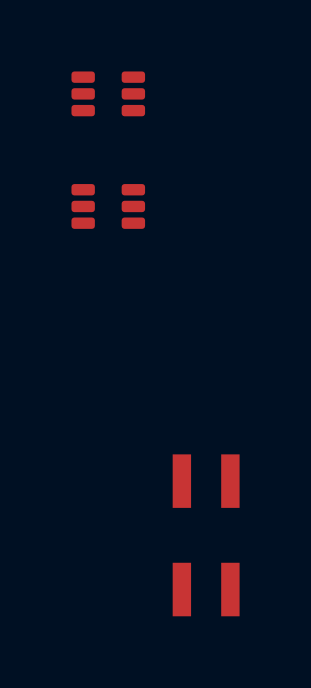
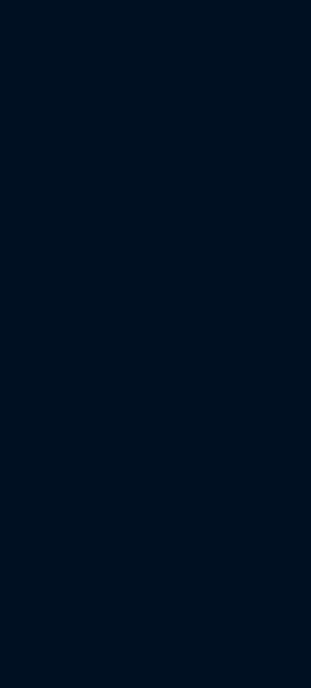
part: (108, 93) -> none
part: (108, 206) -> none
part: (206, 481) -> none
part: (206, 589) -> none

